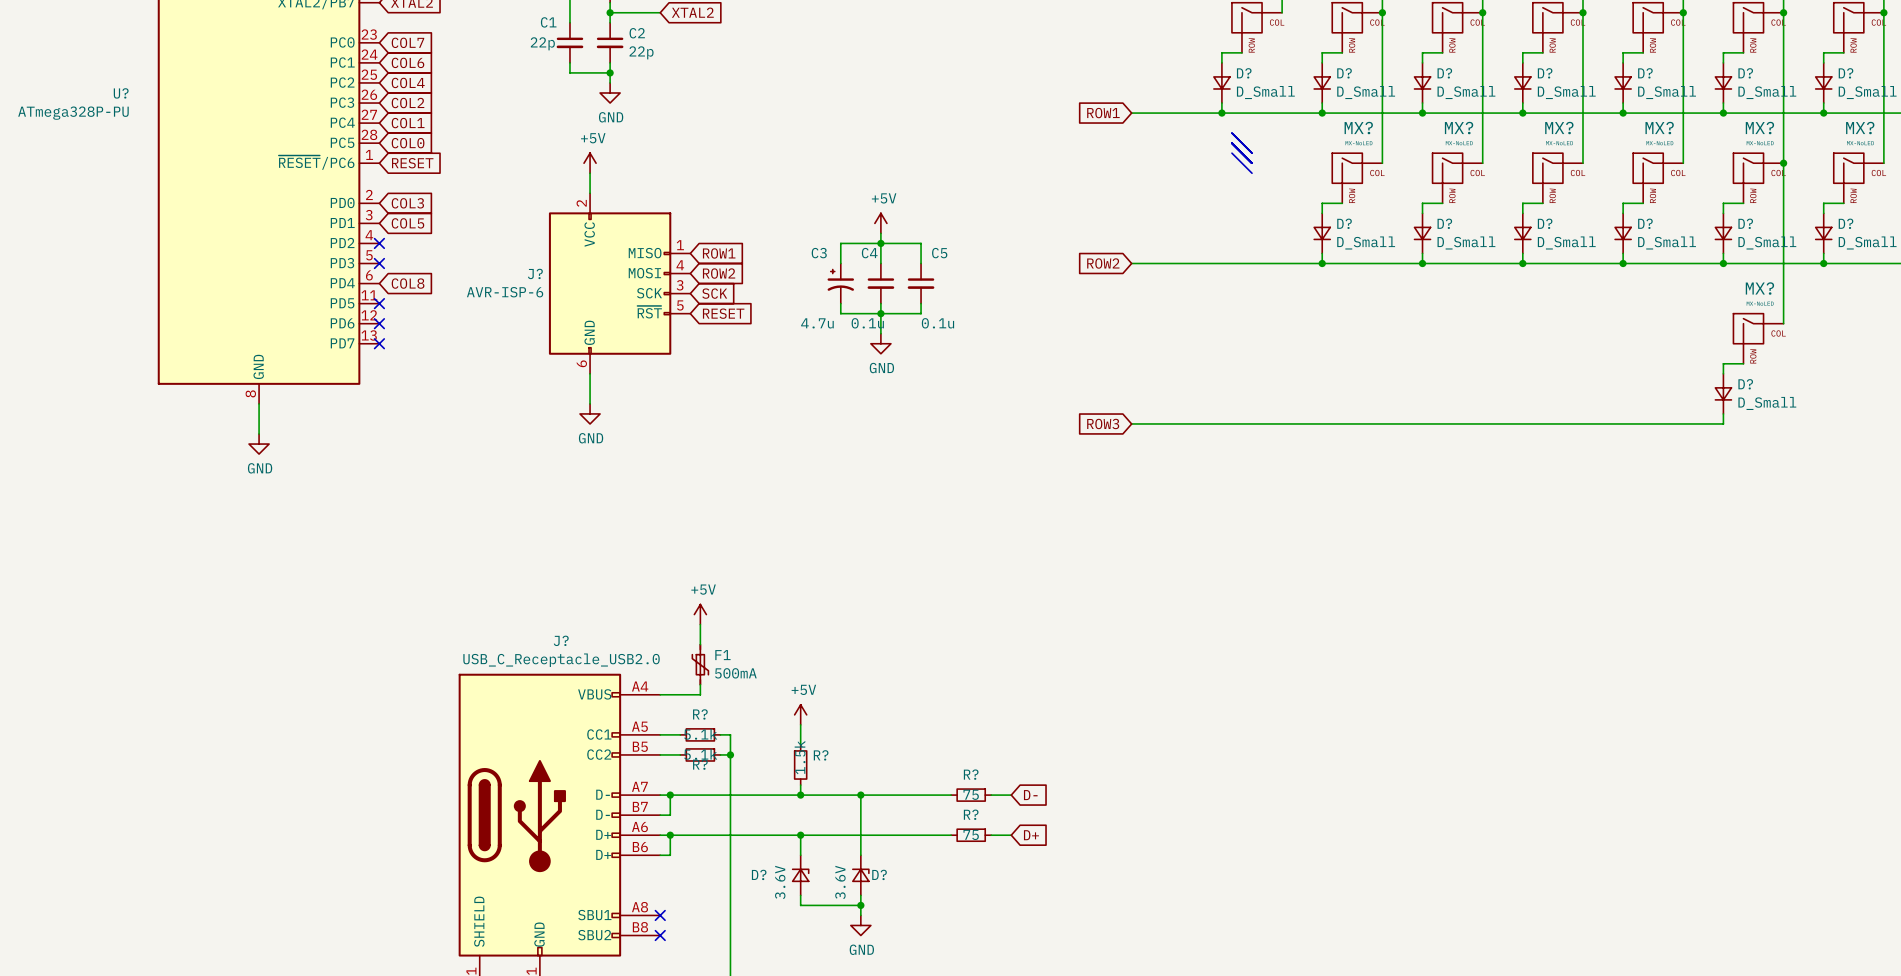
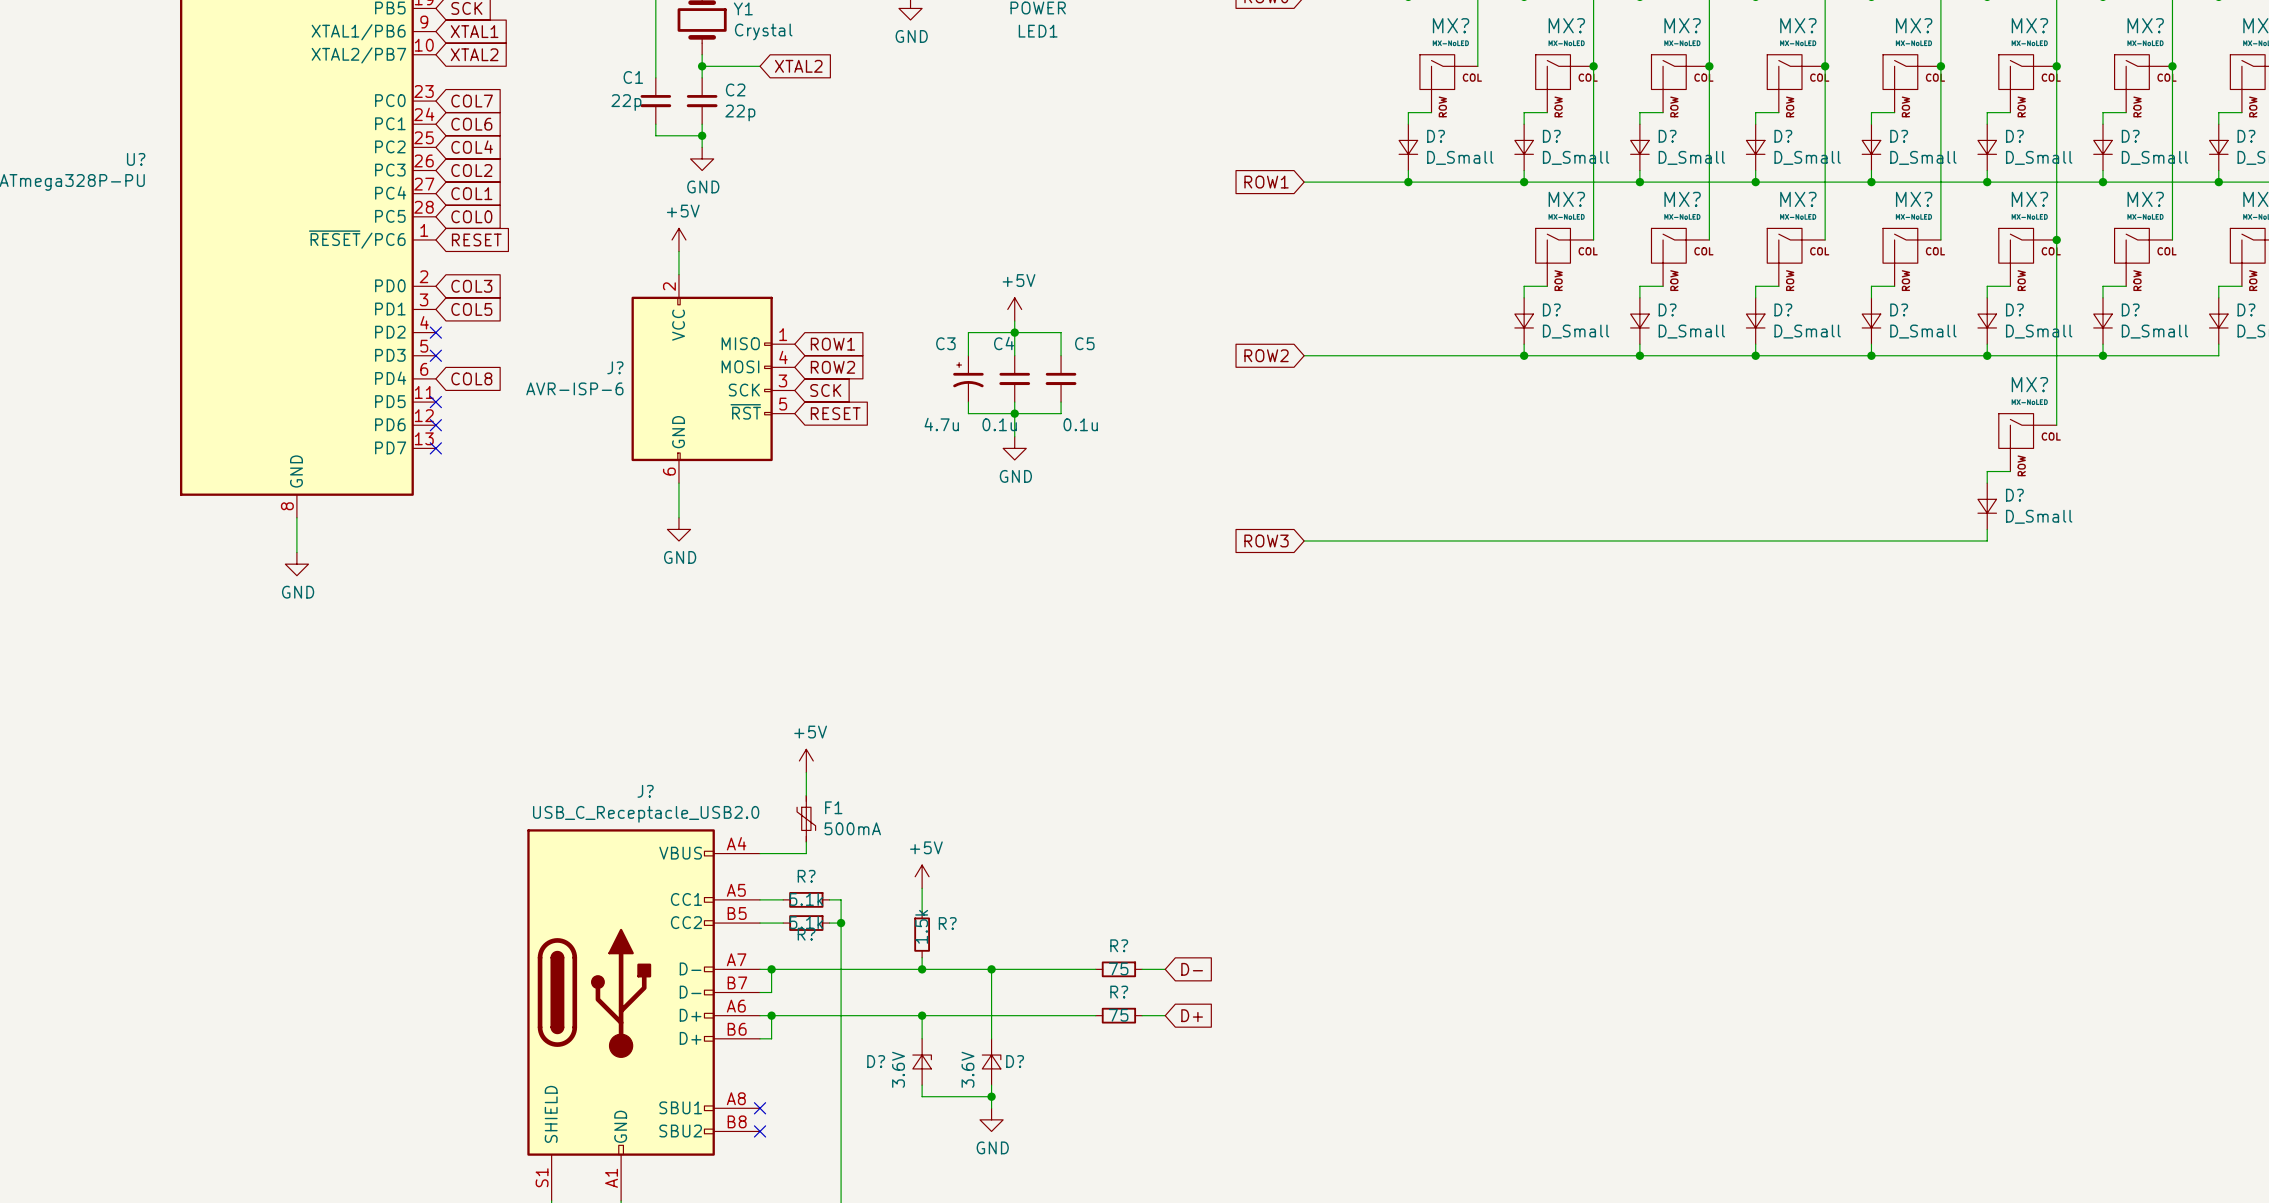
bus: (1231, 133) (1252, 153) -> none
bus: (1231, 143) (1252, 163) -> none
bus: (1231, 153) (1252, 173) -> none

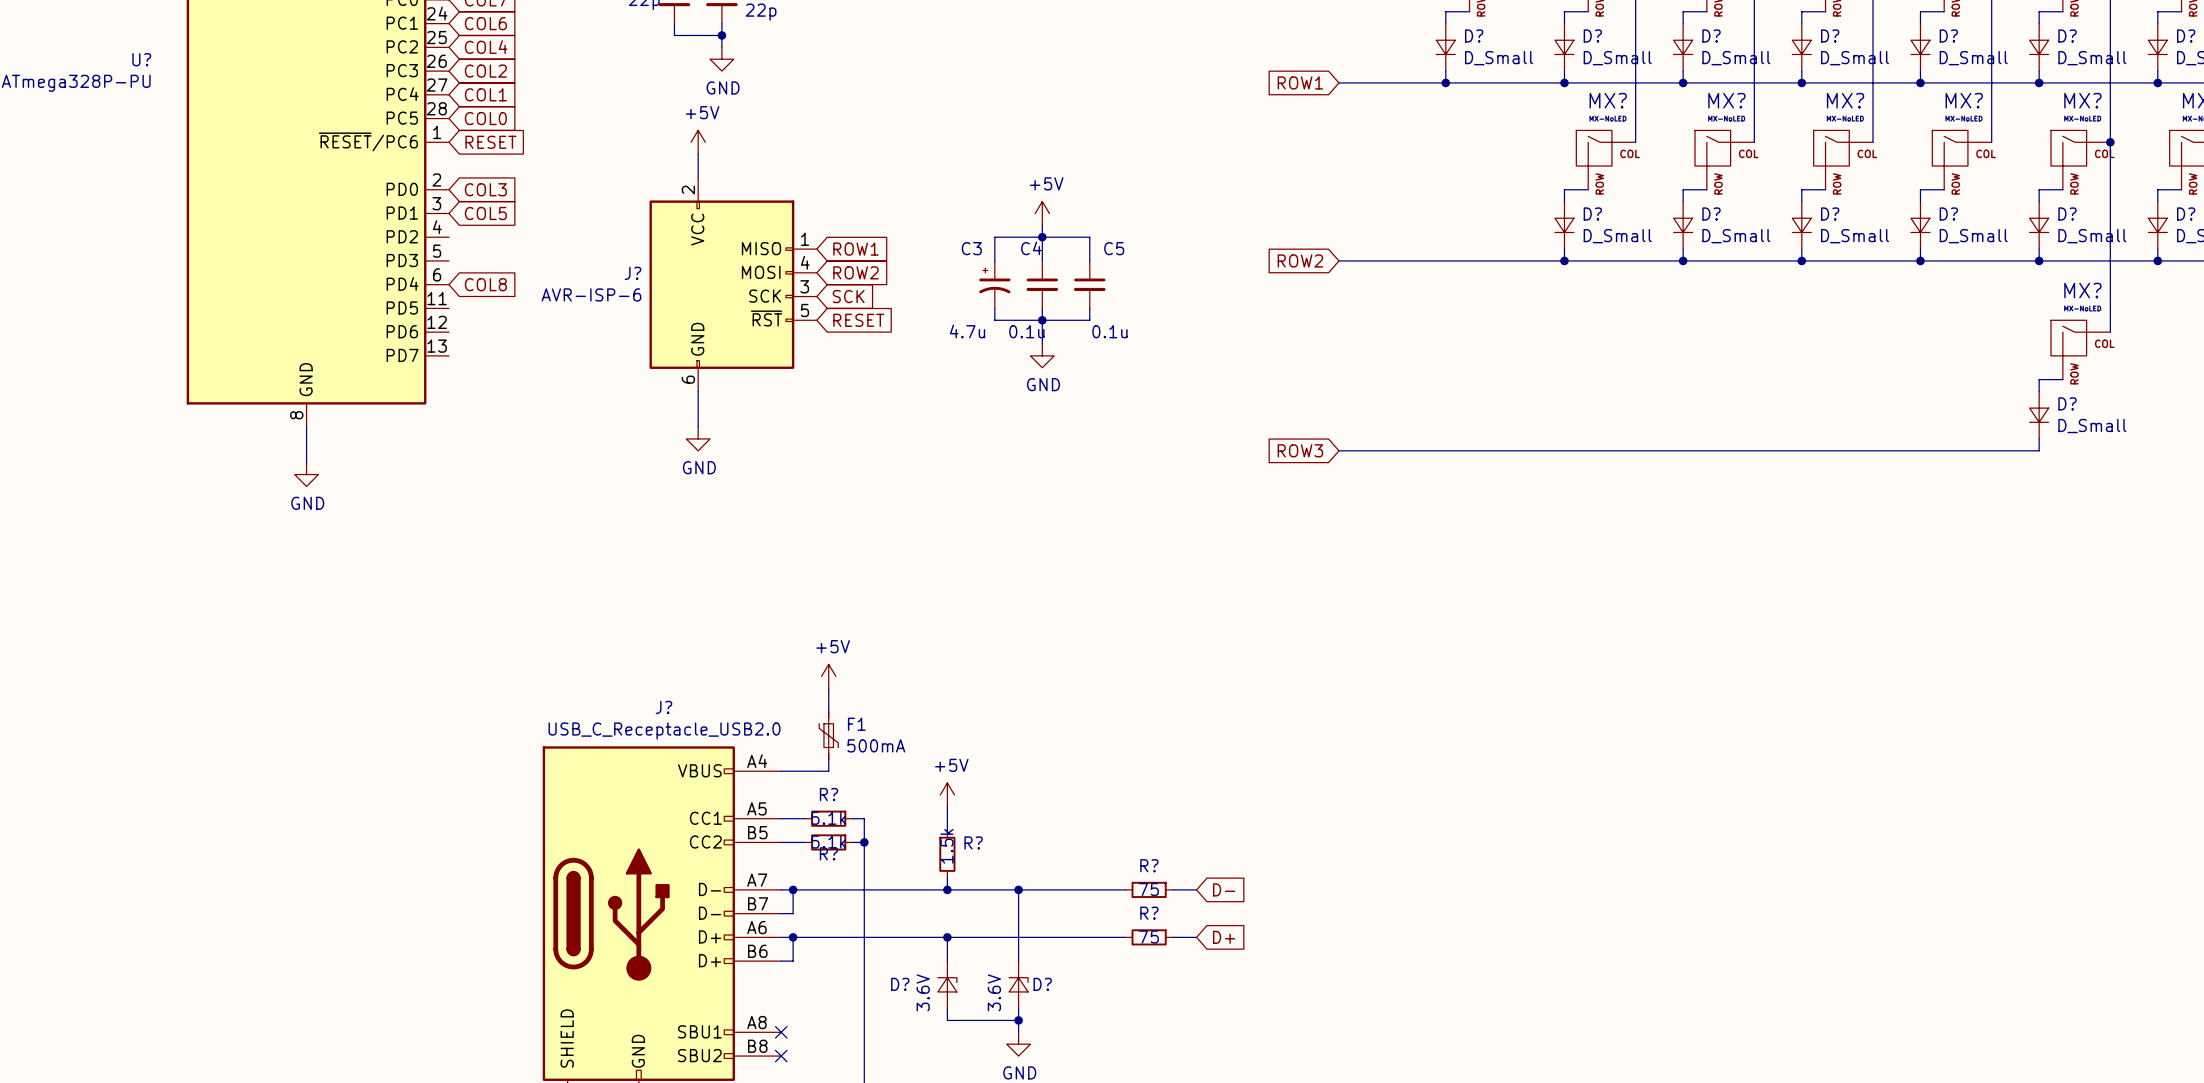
no-connect mark: (435, 332) -> none
no-connect mark: (435, 355) -> none
no-connect mark: (435, 402) -> none
no-connect mark: (435, 425) -> none
no-connect mark: (435, 448) -> none

